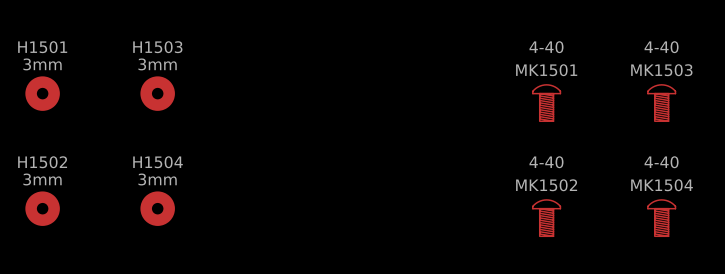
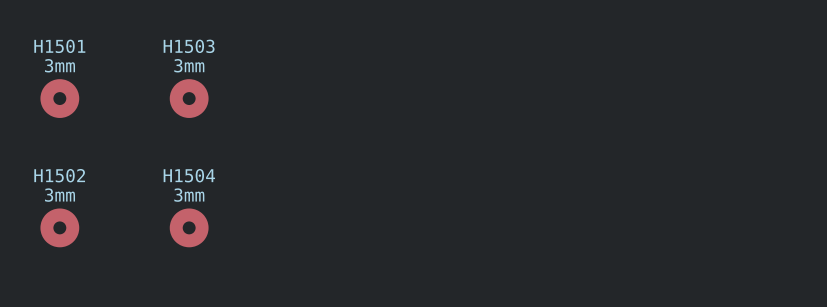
MK1501: 4-40 (546, 103) -> none
MK1503: 4-40 (661, 103) -> none
MK1502: 4-40 (546, 218) -> none
MK1504: 4-40 (661, 218) -> none

